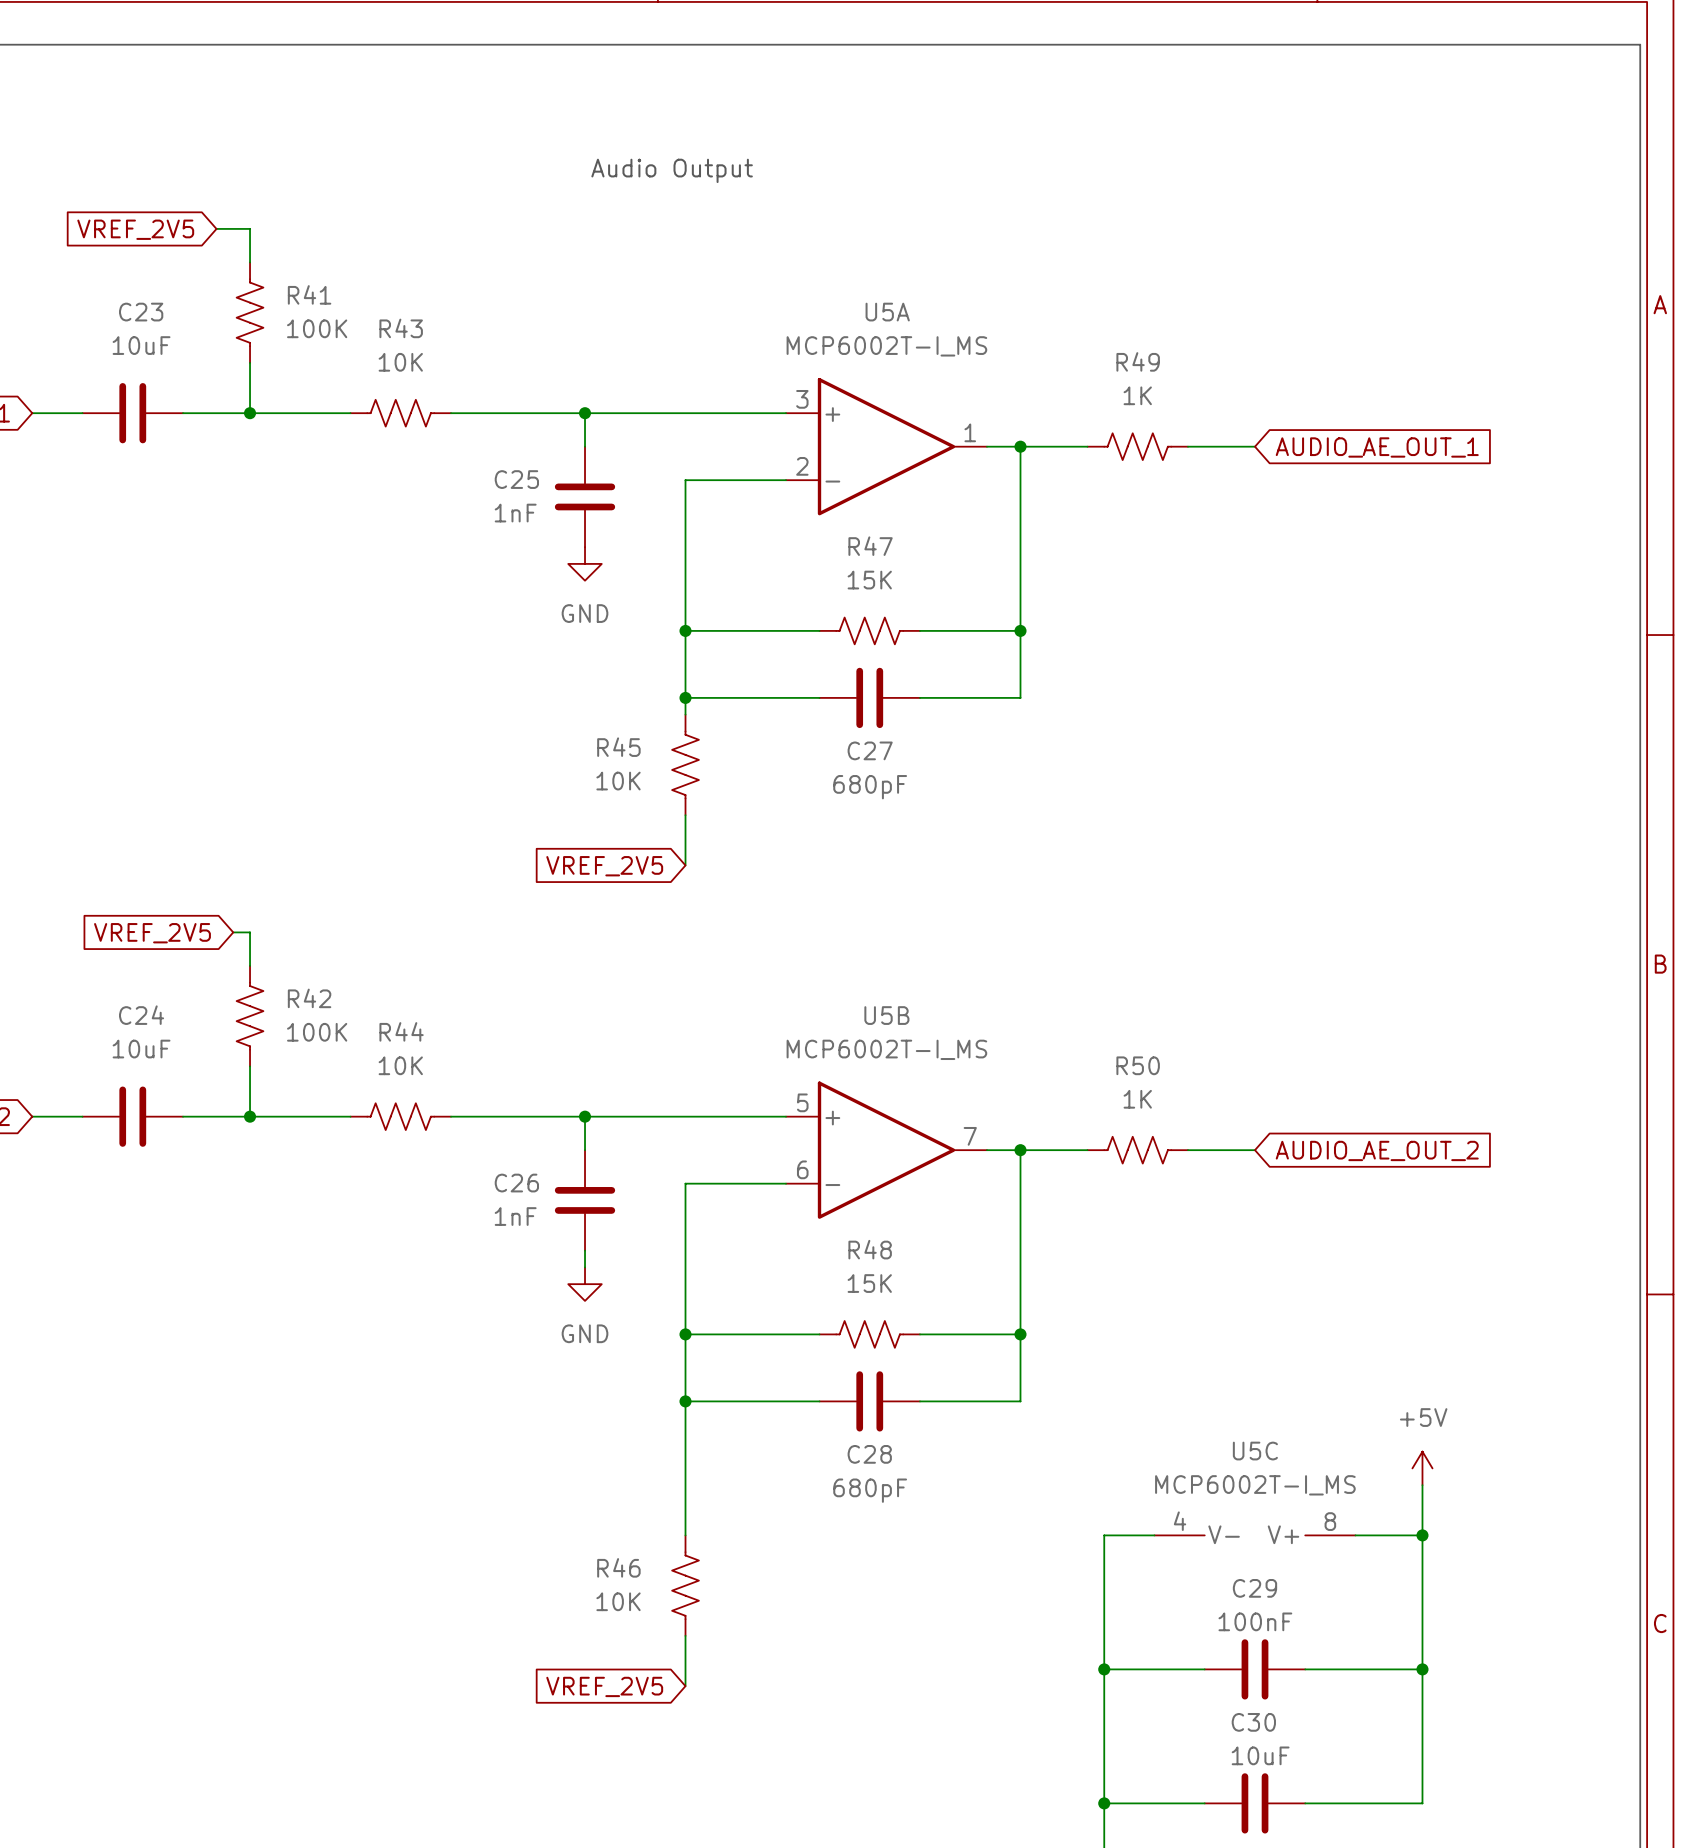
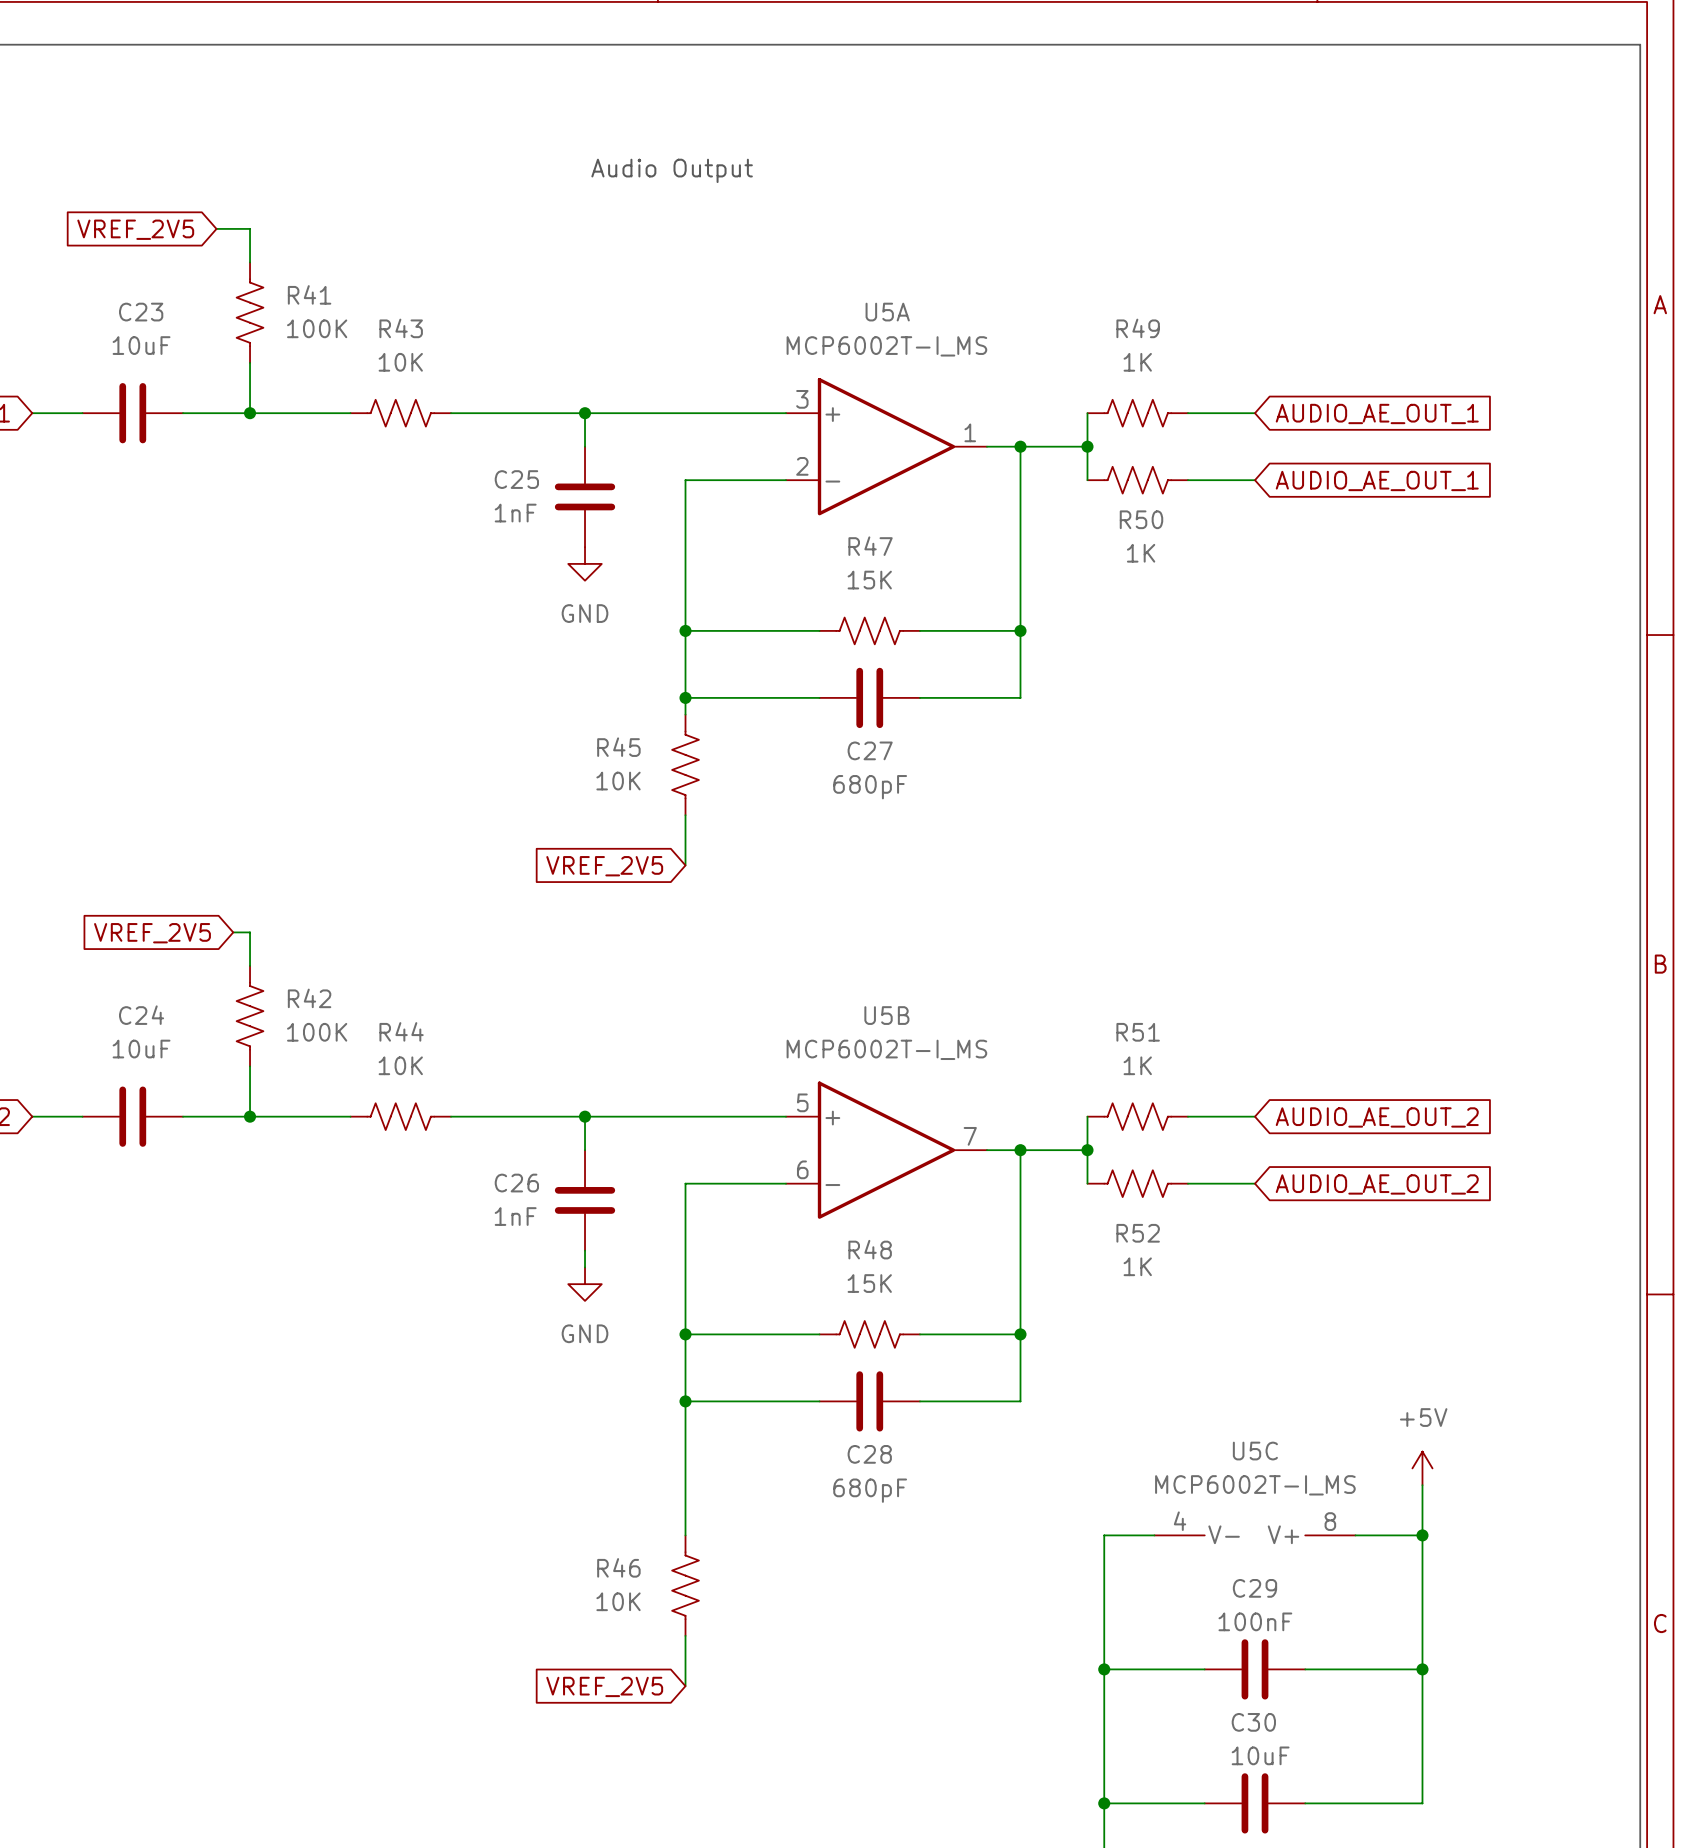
wire: none -> (1087, 413) (1087, 480)
global label: none -> AUDIO_AE_OUT_1 (1377, 413)
junction: none -> (1087, 446)
R49 position: (1137, 446) -> (1137, 413)
wire: (1187, 446) (1254, 446) -> (1187, 413) (1254, 413)
global label: AUDIO_AE_OUT_1 (1377, 447) -> none
wire: none -> (1187, 480) (1254, 480)
global label: none -> AUDIO_AE_OUT_1 (1377, 480)
R50 name position: R50 (1138, 1065) -> R50 (1141, 519)
R50 value position: 1K (1137, 1099) -> 1K (1141, 553)
wire: none -> (1087, 1116) (1087, 1183)
R51: none -> 1K (1137, 1116)
wire: none -> (1187, 1116) (1254, 1116)
global label: none -> AUDIO_AE_OUT_2 (1377, 1117)
junction: none -> (1087, 1150)
R50 position: (1137, 1150) -> (1137, 480)
wire: (1187, 1150) (1254, 1150) -> (1187, 1183) (1254, 1183)
global label: AUDIO_AE_OUT_2 (1377, 1150) -> none
R52: none -> 1K (1137, 1183)
global label: none -> AUDIO_AE_OUT_2 (1377, 1184)

